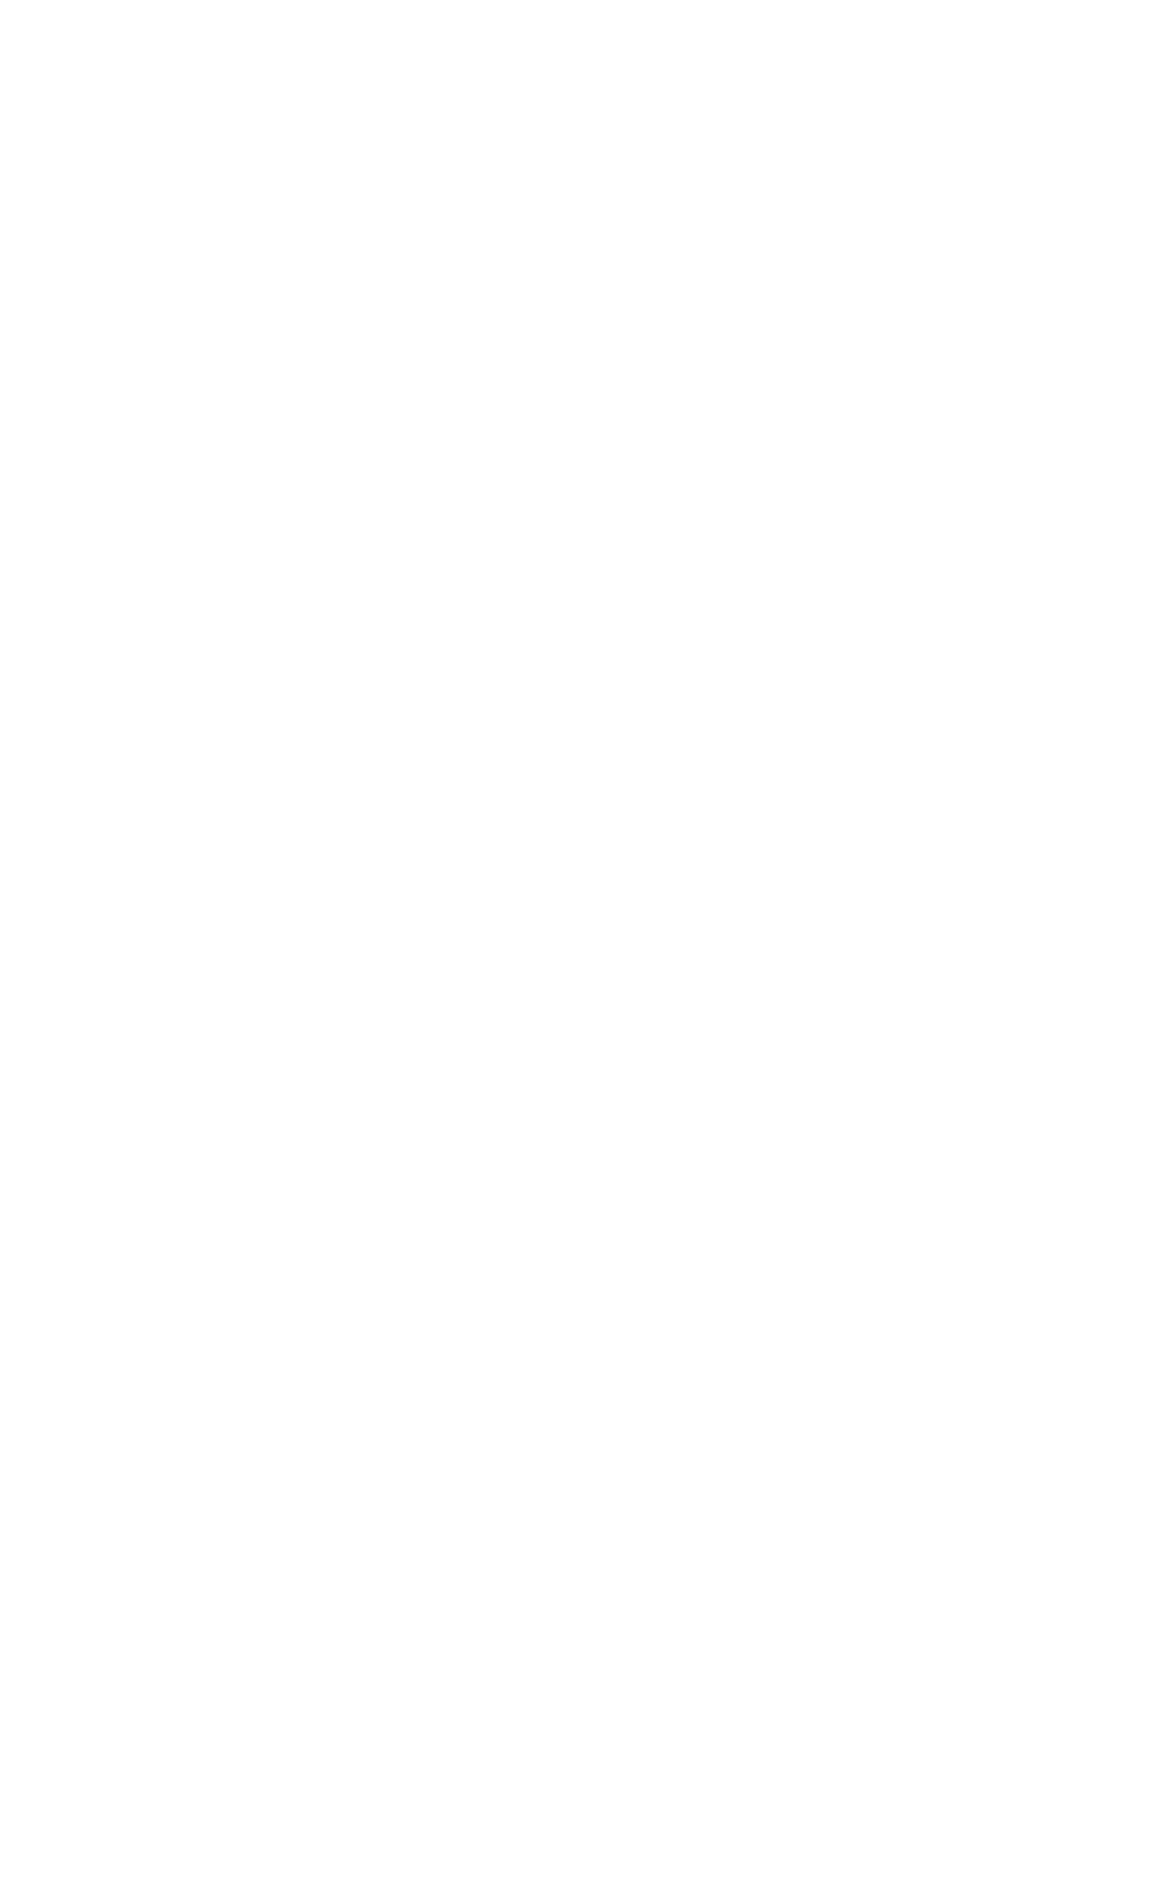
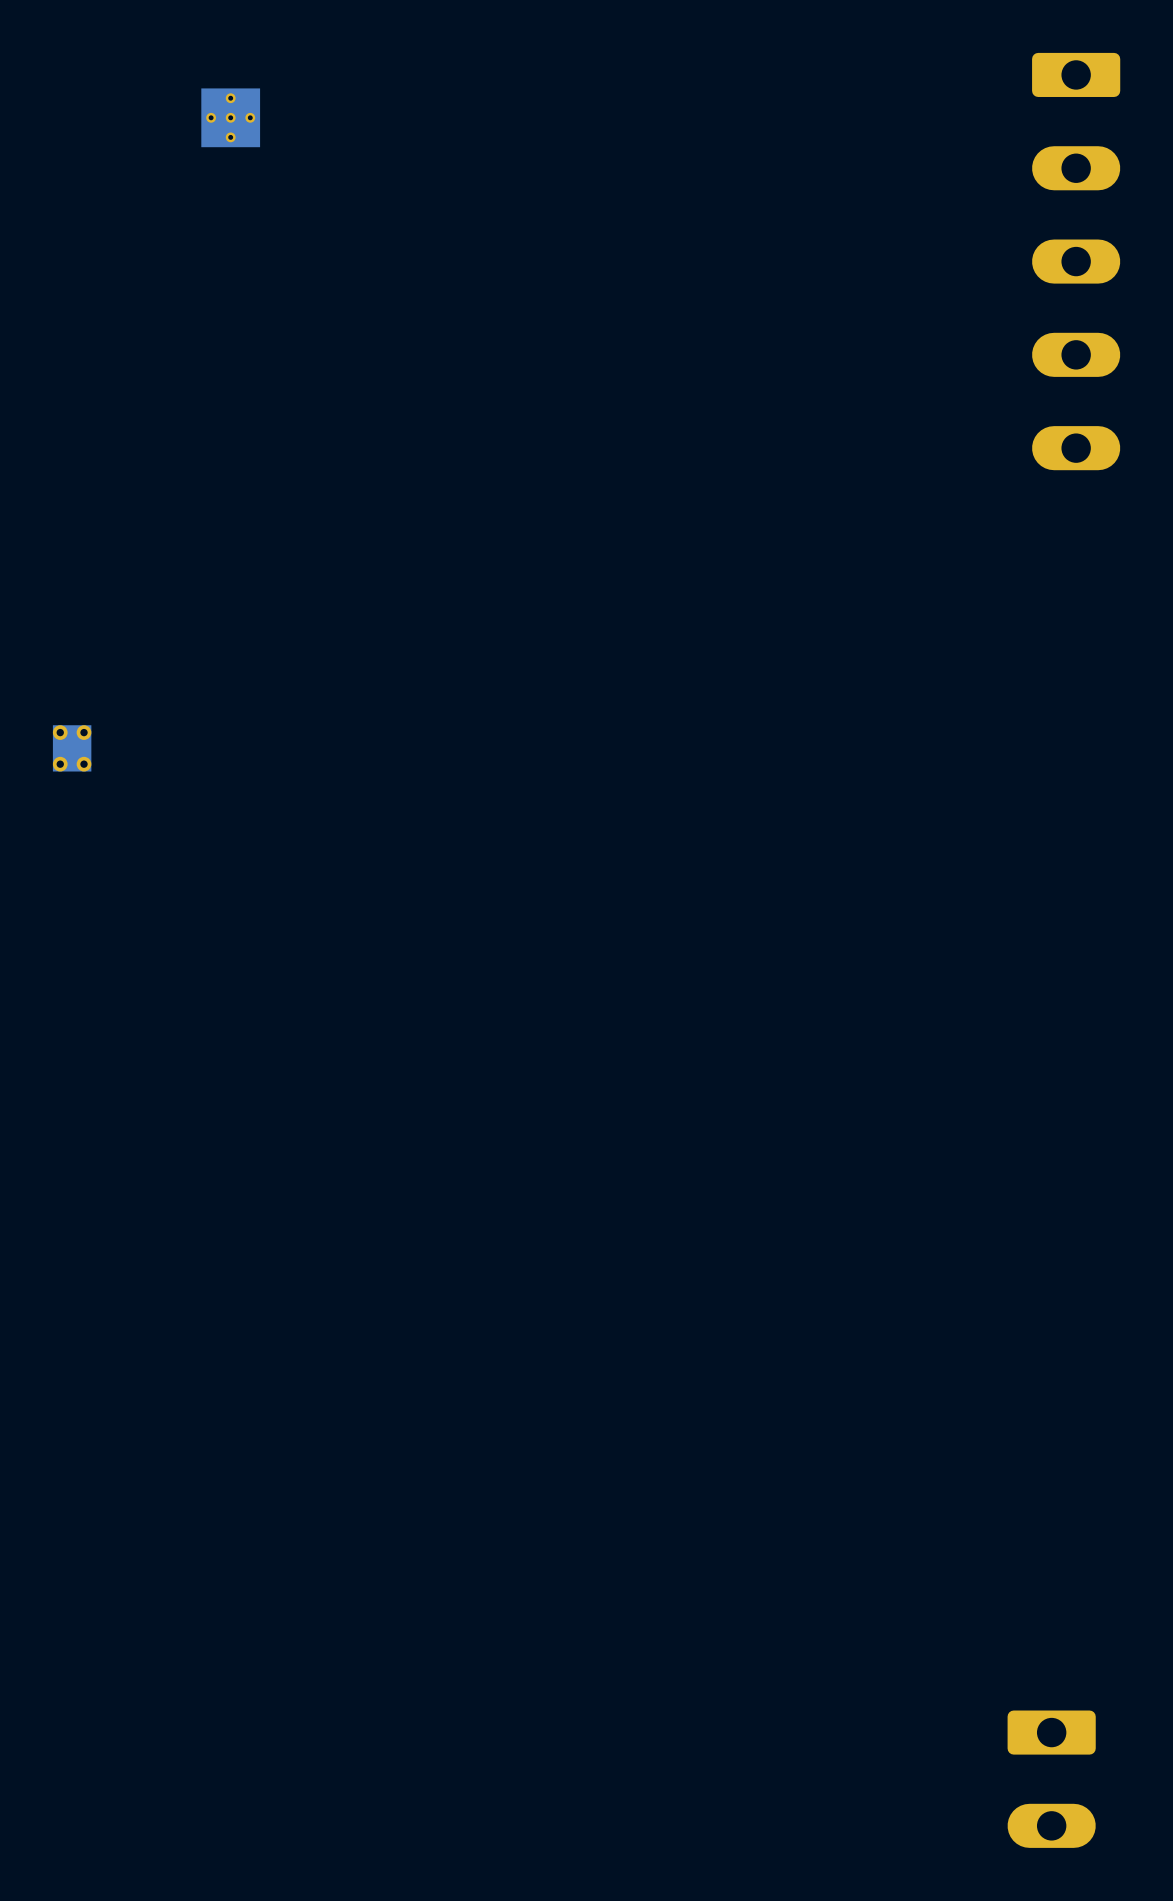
part: none -> (230, 117)
part: none -> (1076, 261)
part: none -> (72, 748)
part: none -> (1051, 1779)

